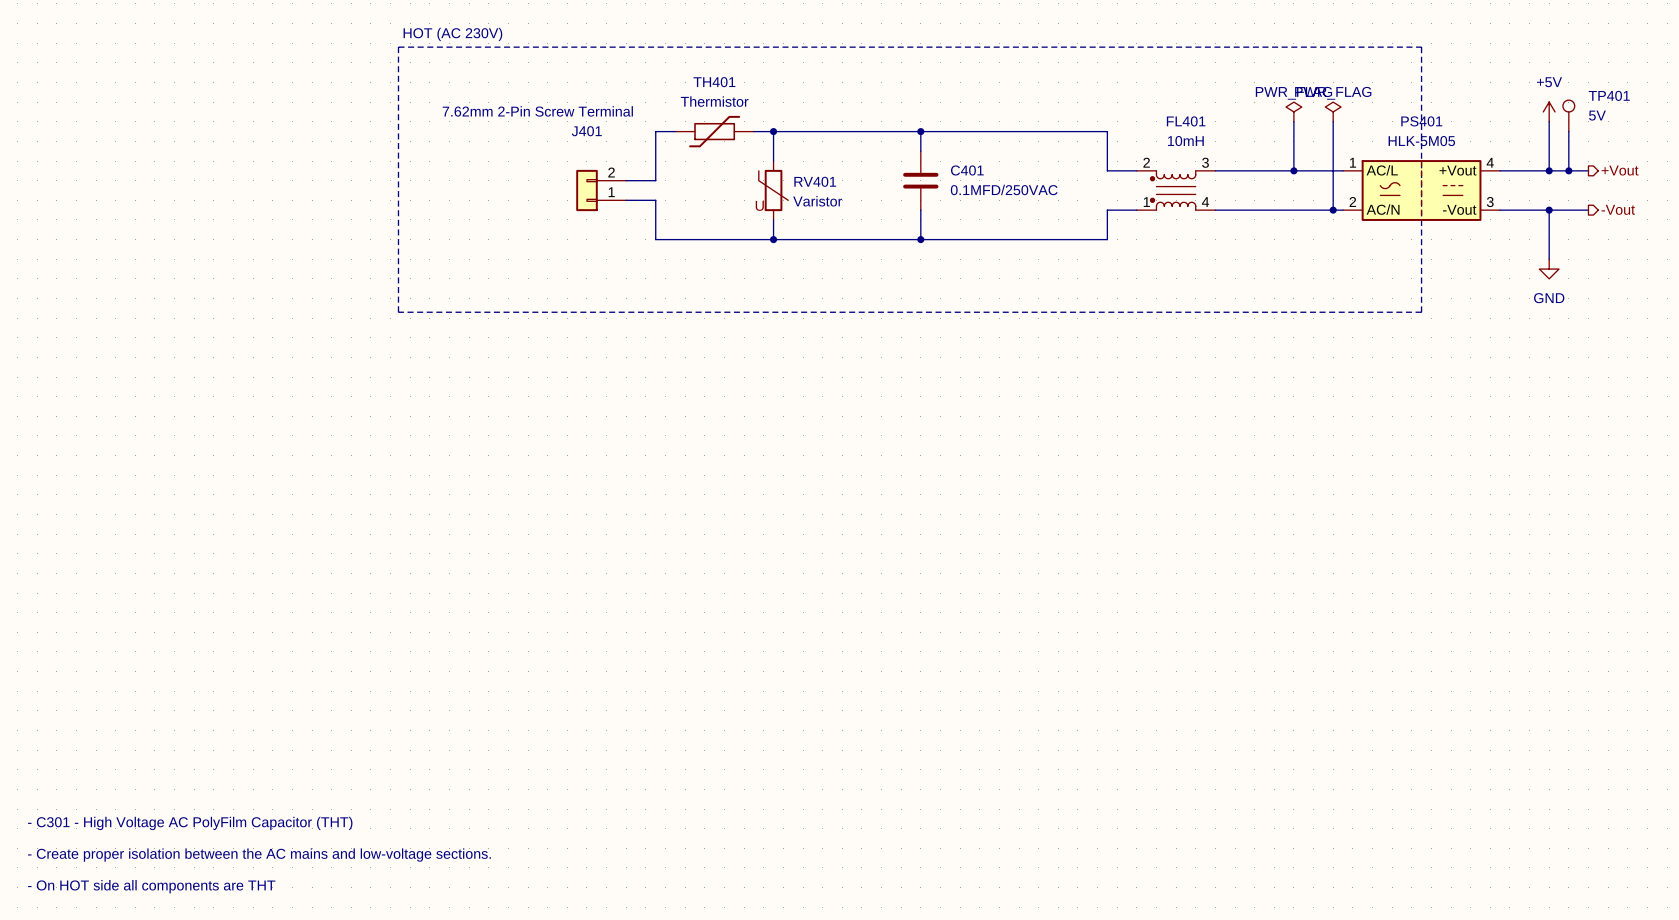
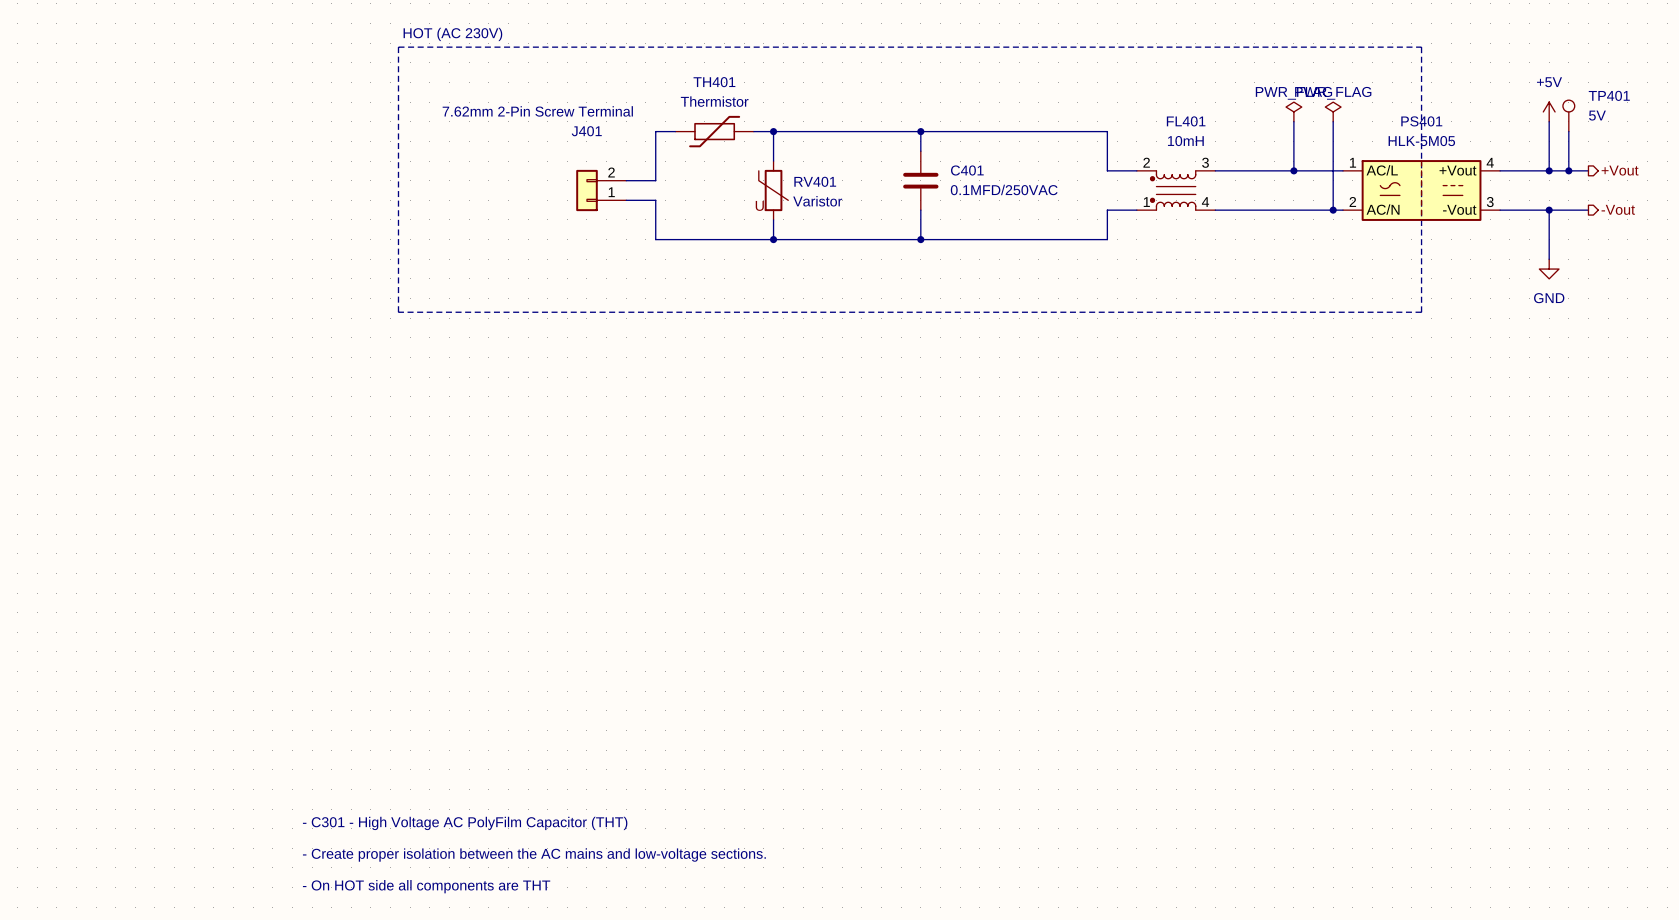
text: - C301 - High Voltage AC PolyFilm Capacitor (THT) (190, 823) -> none
text: none -> - C301 - High Voltage AC PolyFilm Capacitor (THT) (465, 823)
text: - Create proper isolation between the AC mains and low-voltage sections. (259, 855) -> none
text: none -> - Create proper isolation between the AC mains and low-voltage sections. (534, 855)
text: - On HOT side all components are THT (151, 886) -> none
text: none -> - On HOT side all components are THT (426, 886)

